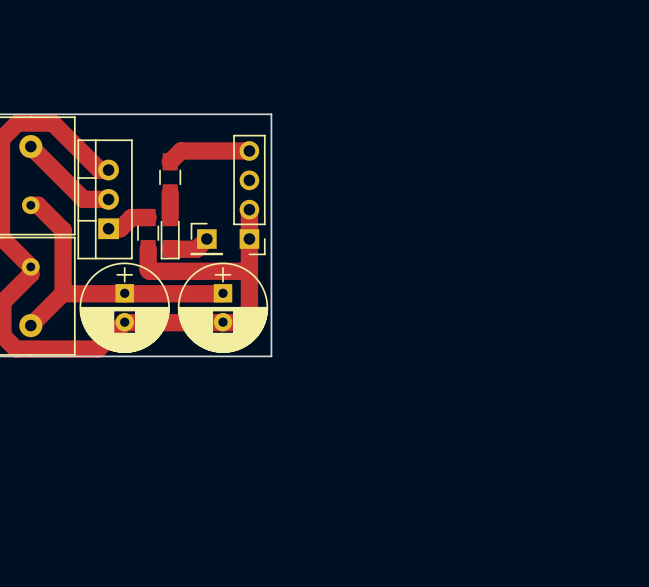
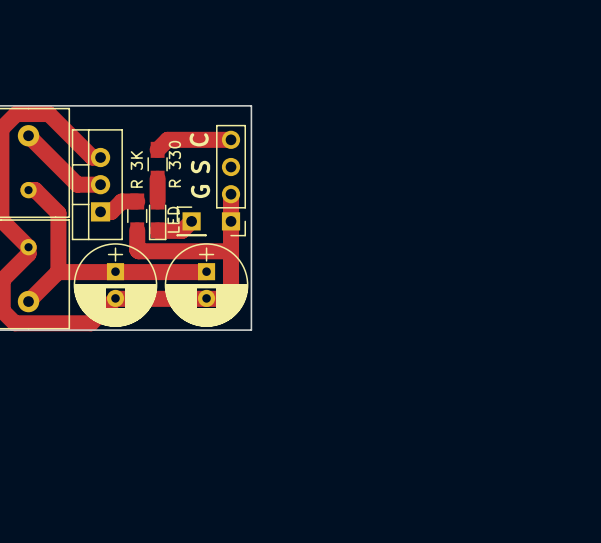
text: none -> C (199, 139)
part value: none -> R 330 (174, 164)
text: none -> S (200, 167)
part value: none -> R 3K (136, 169)
text: none -> G (200, 191)
part value: none -> LED (173, 219)

